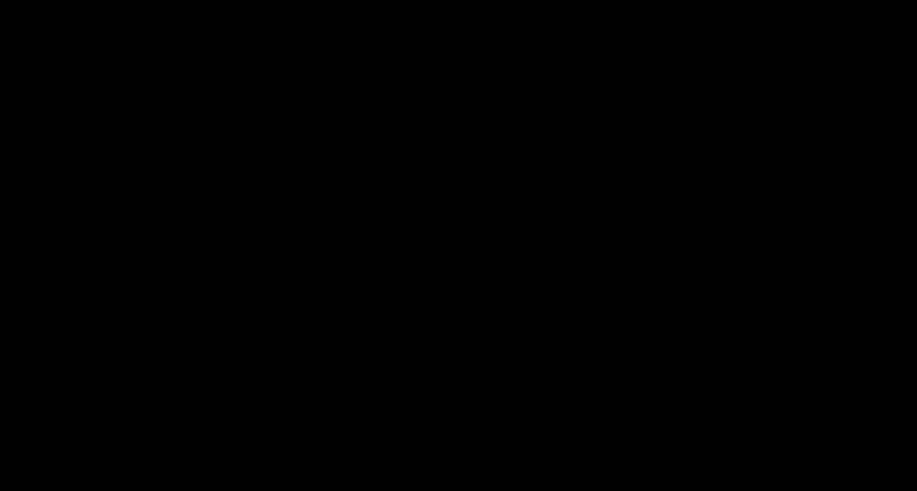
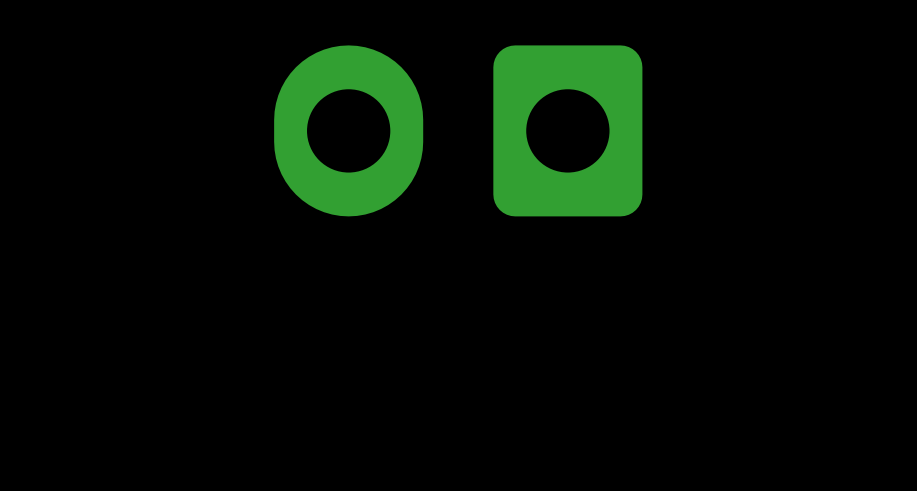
part: none -> (458, 130)

